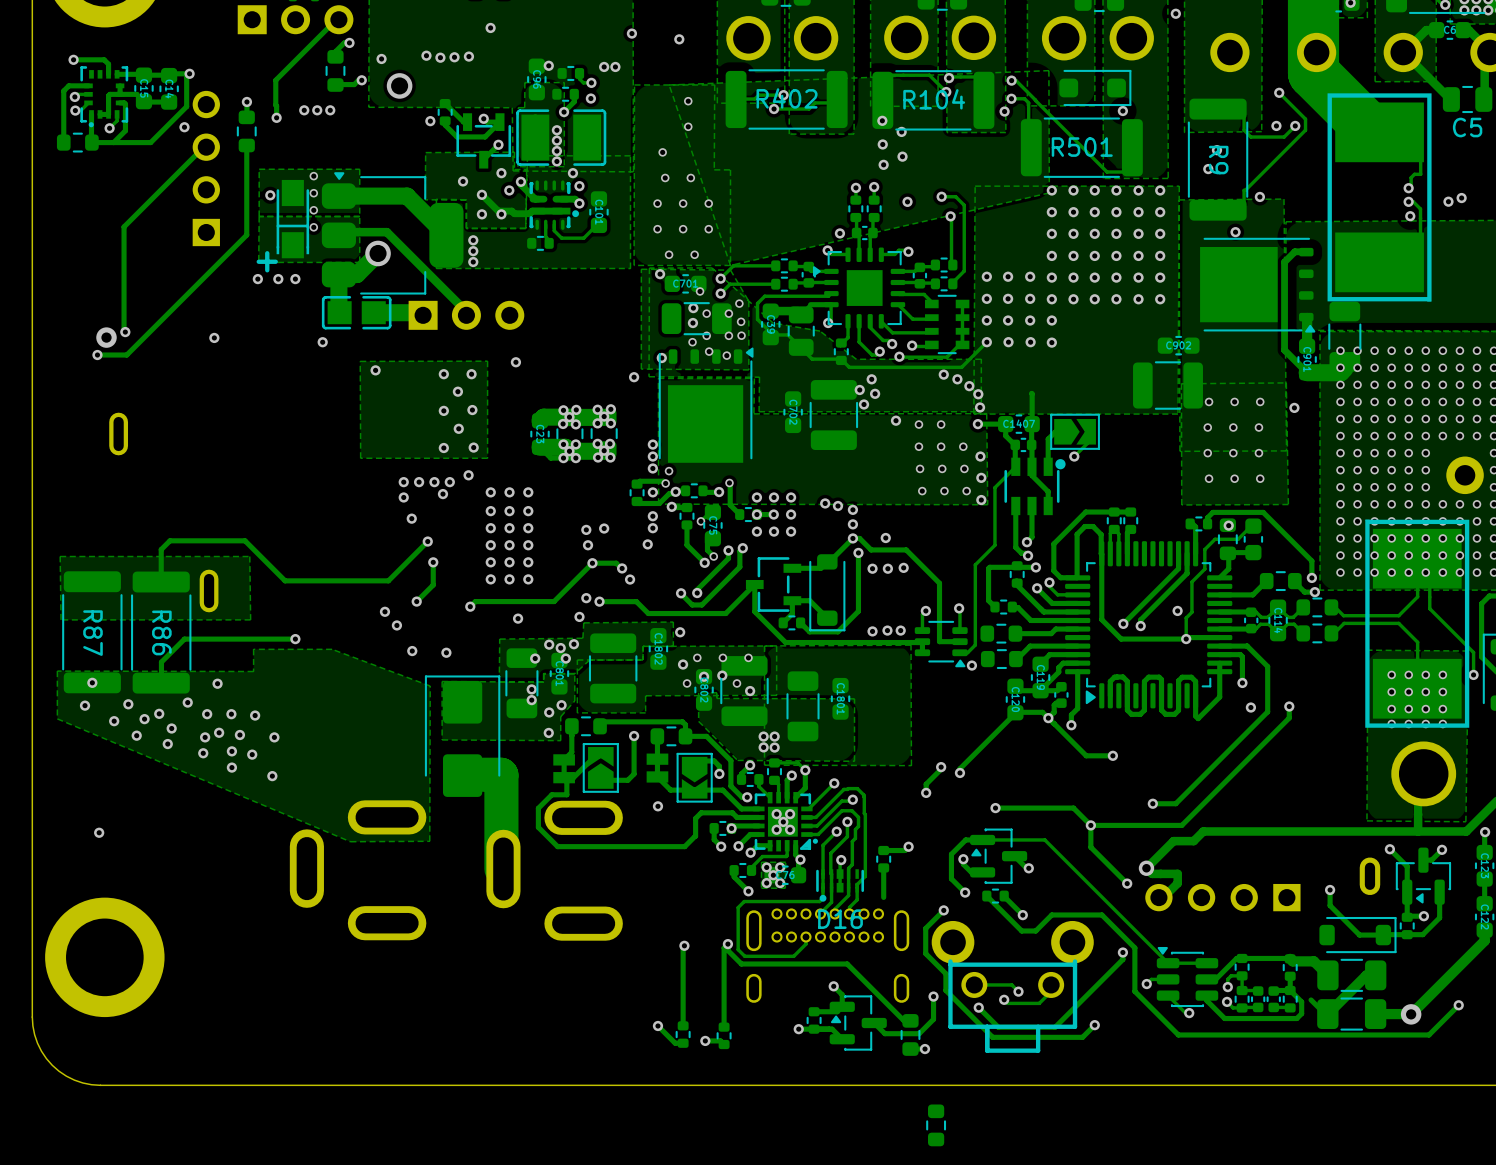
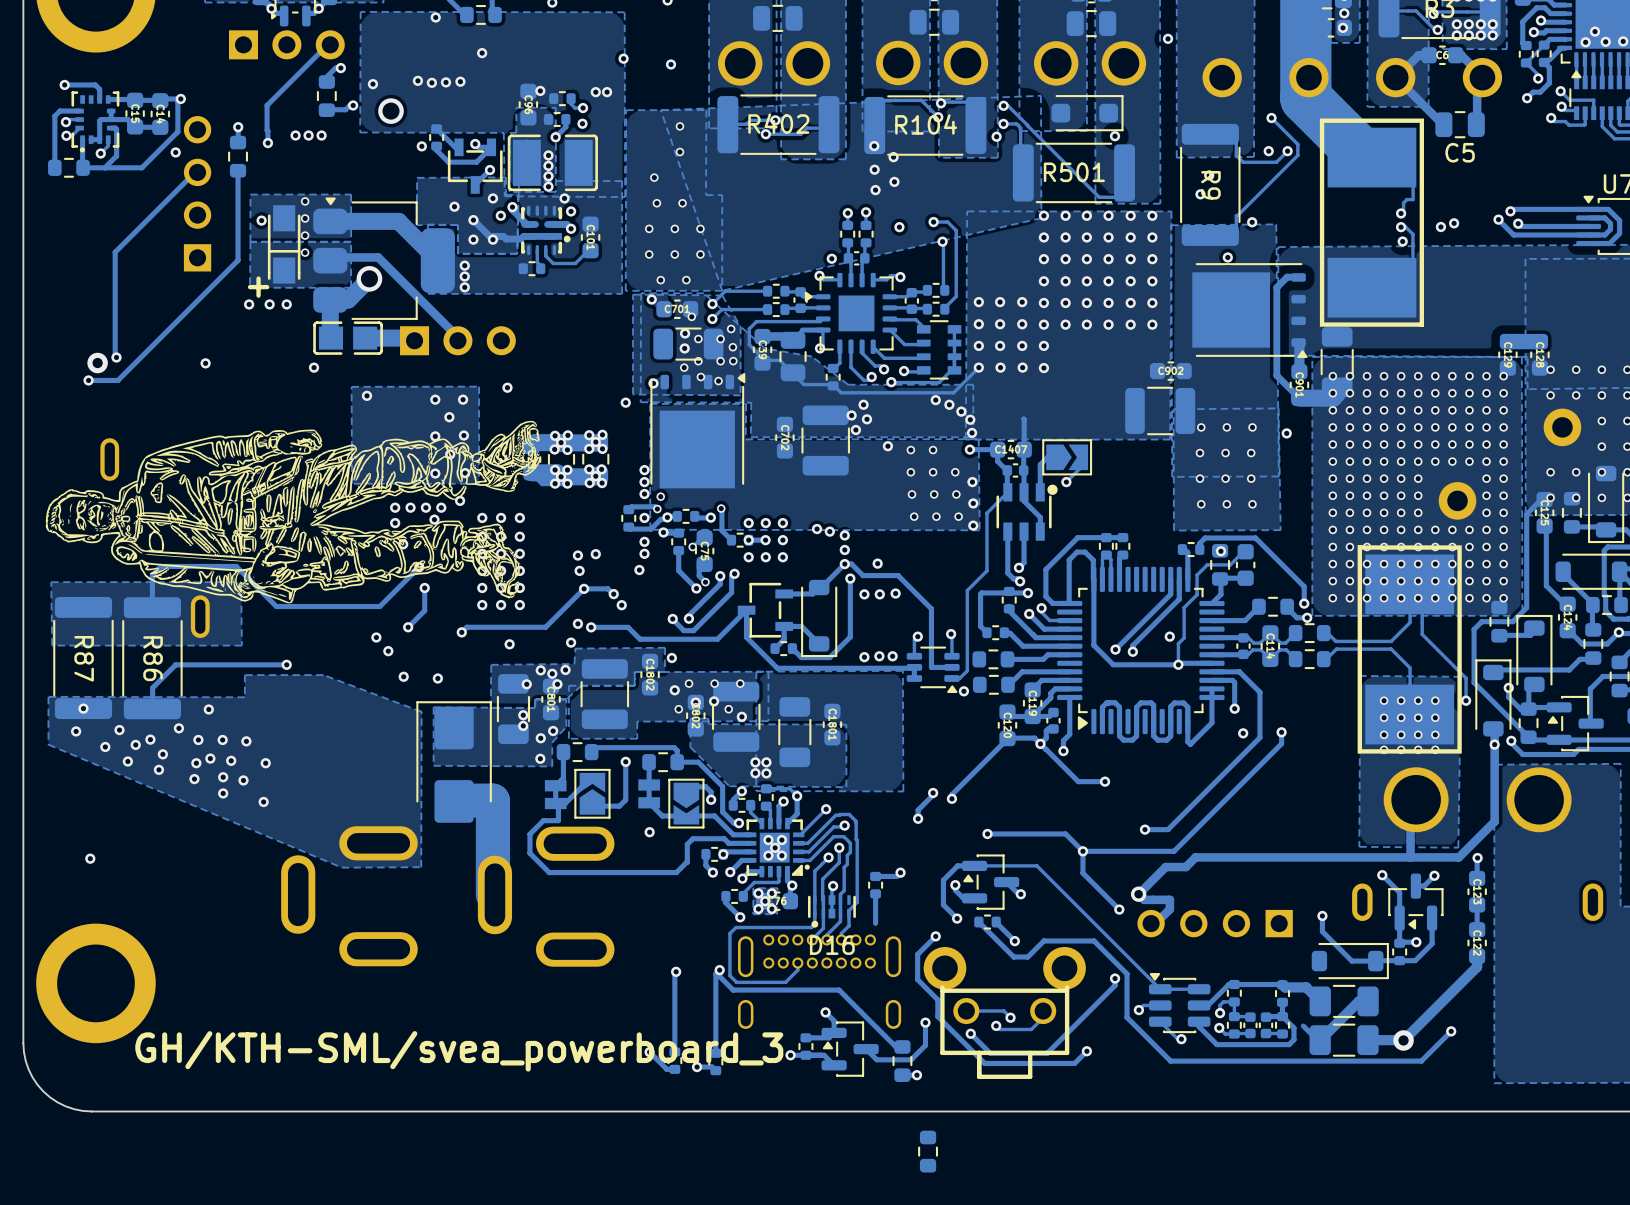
drawing: none -> [45, 420, 541, 604]
text: none -> GH/KTH-SML/svea_powerboard_3 (459, 1051)

